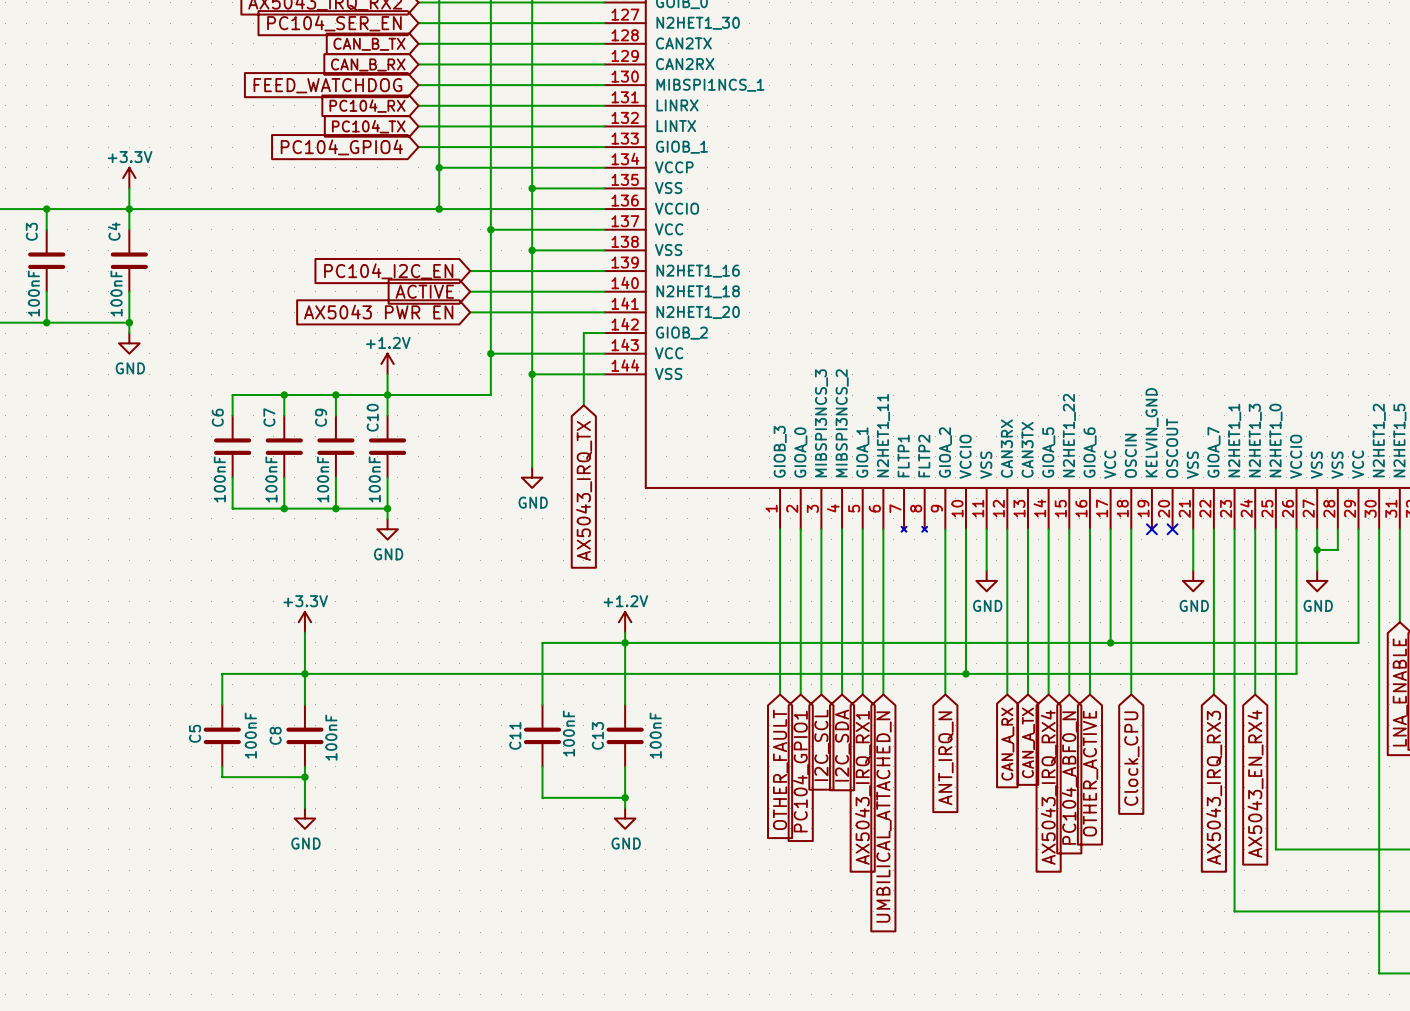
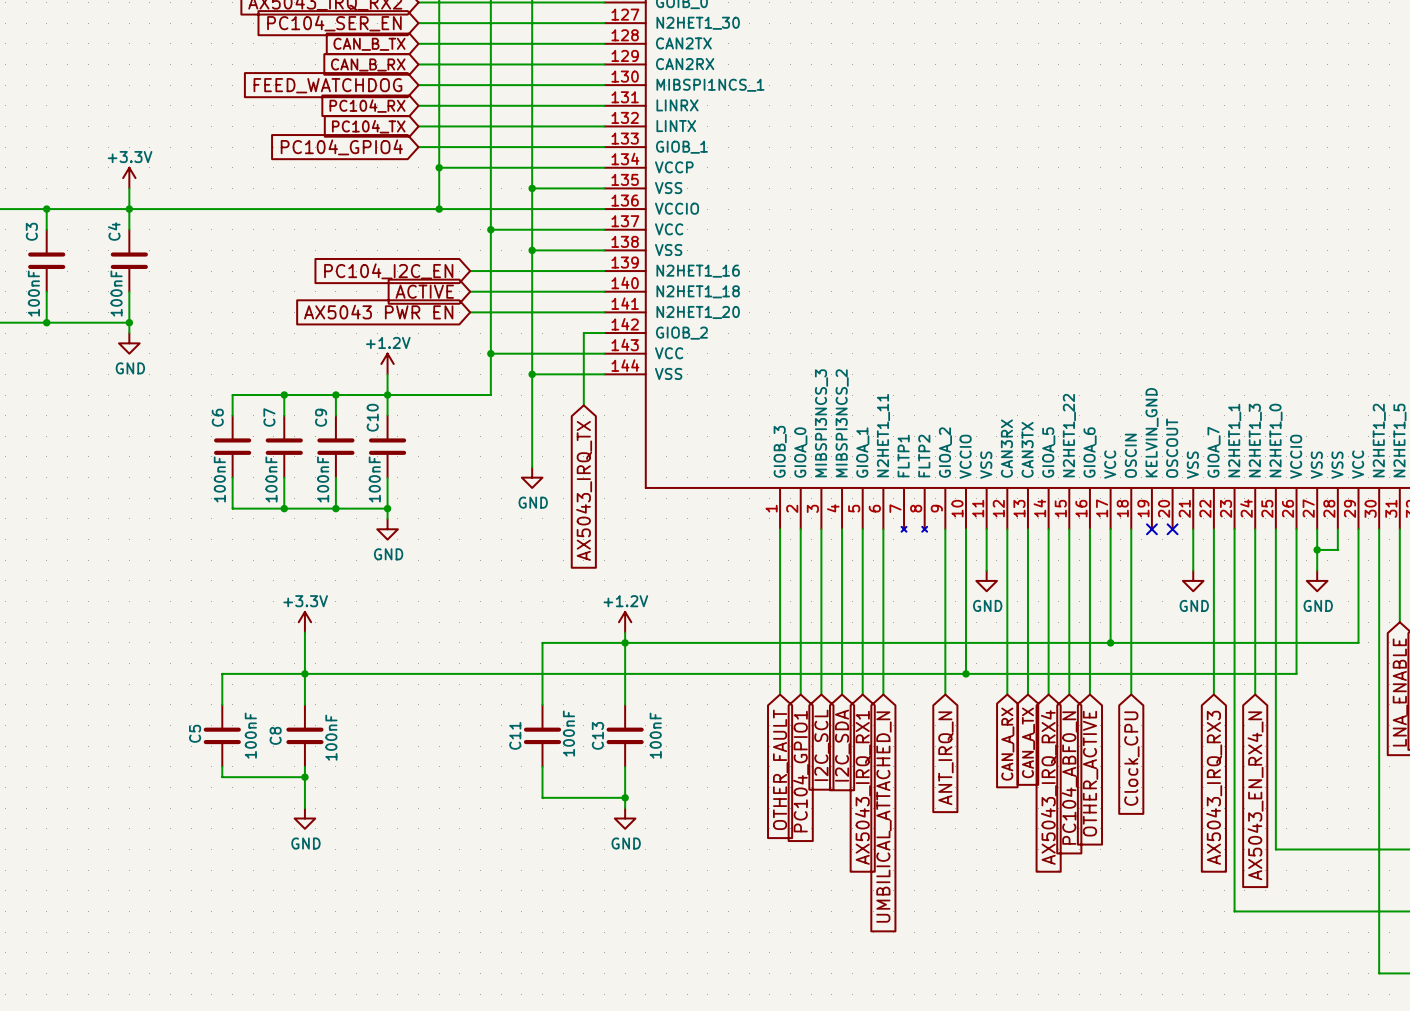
global label: AX5043_EN_RX4 (1255, 783) -> AX5043_EN_RX4_N (1255, 795)

